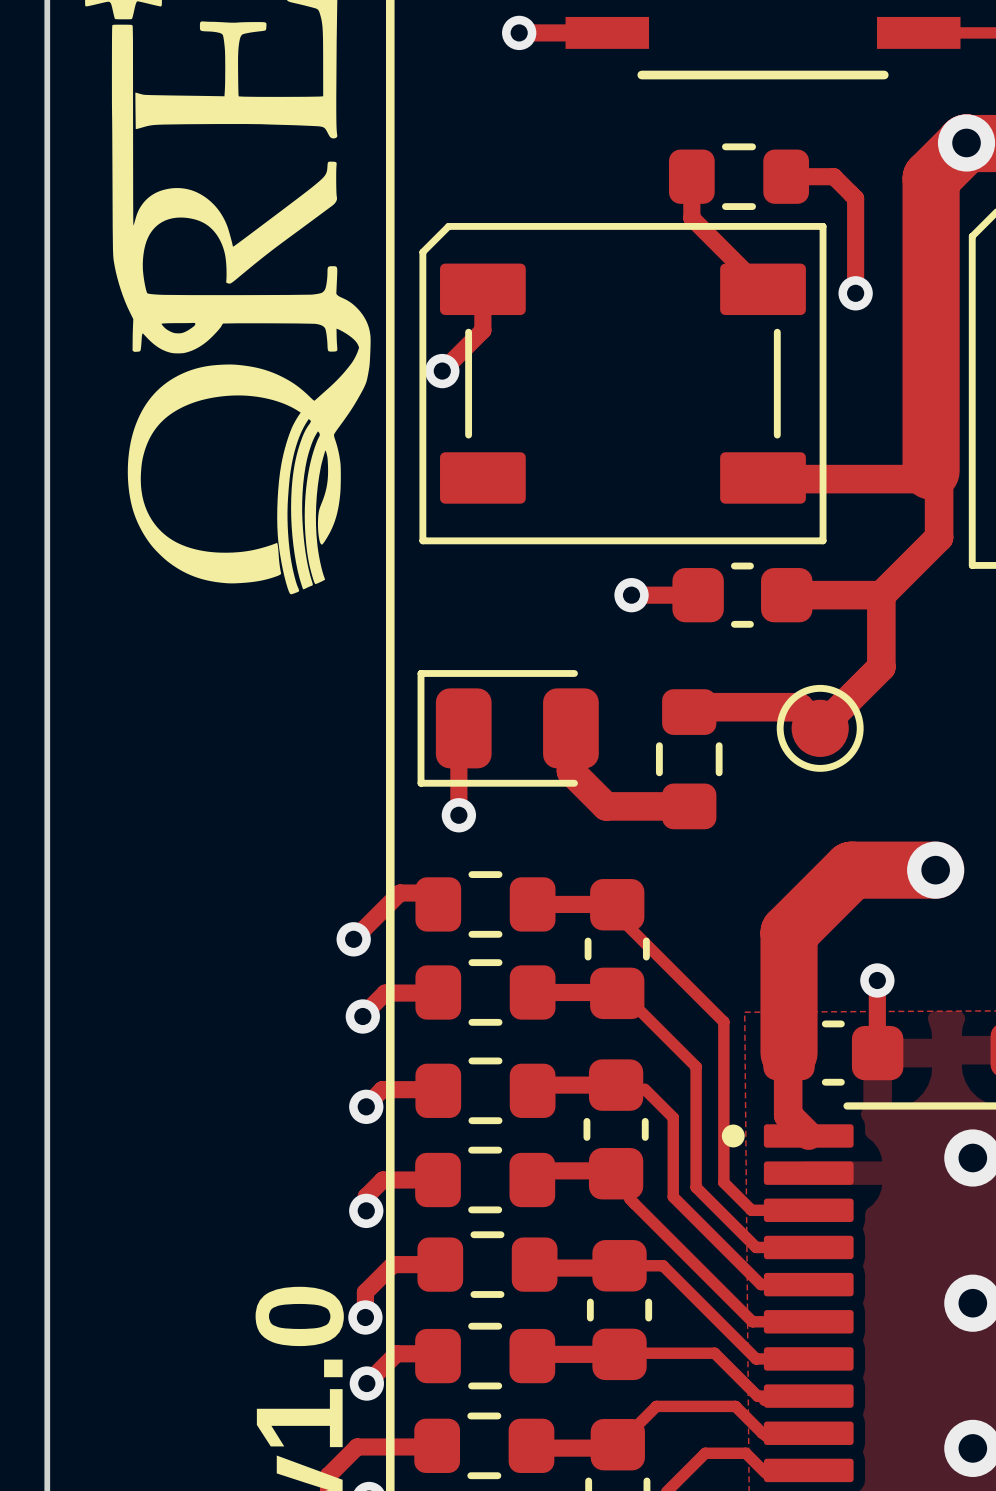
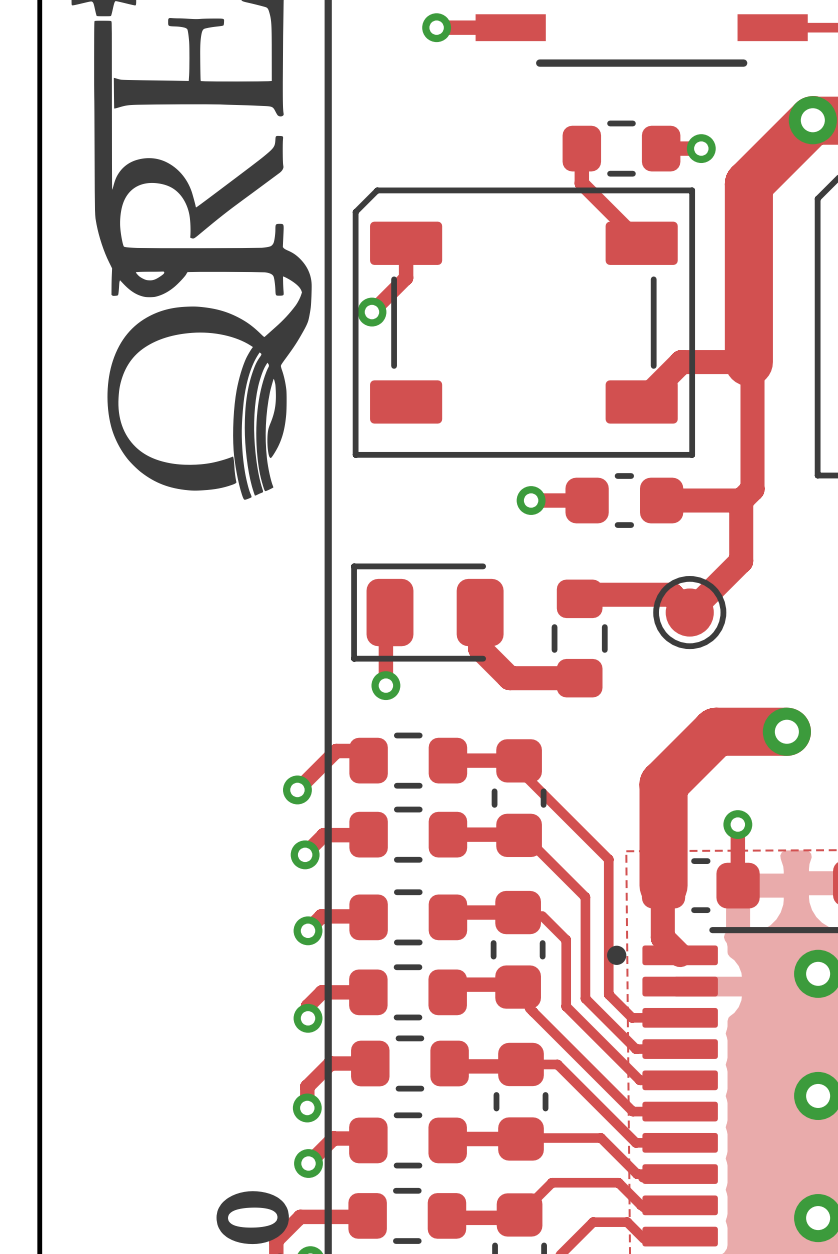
track: (833, 176) (855, 198) (855, 300) -> none
track: (931, 178) (931, 471) -> (783, 150) (748, 184) (748, 362)
via position: (855, 293) -> (701, 148)
track: (763, 477) (939, 479) (939, 537) (894, 581) -> (641, 401) (681, 362) (752, 362) (752, 489)

